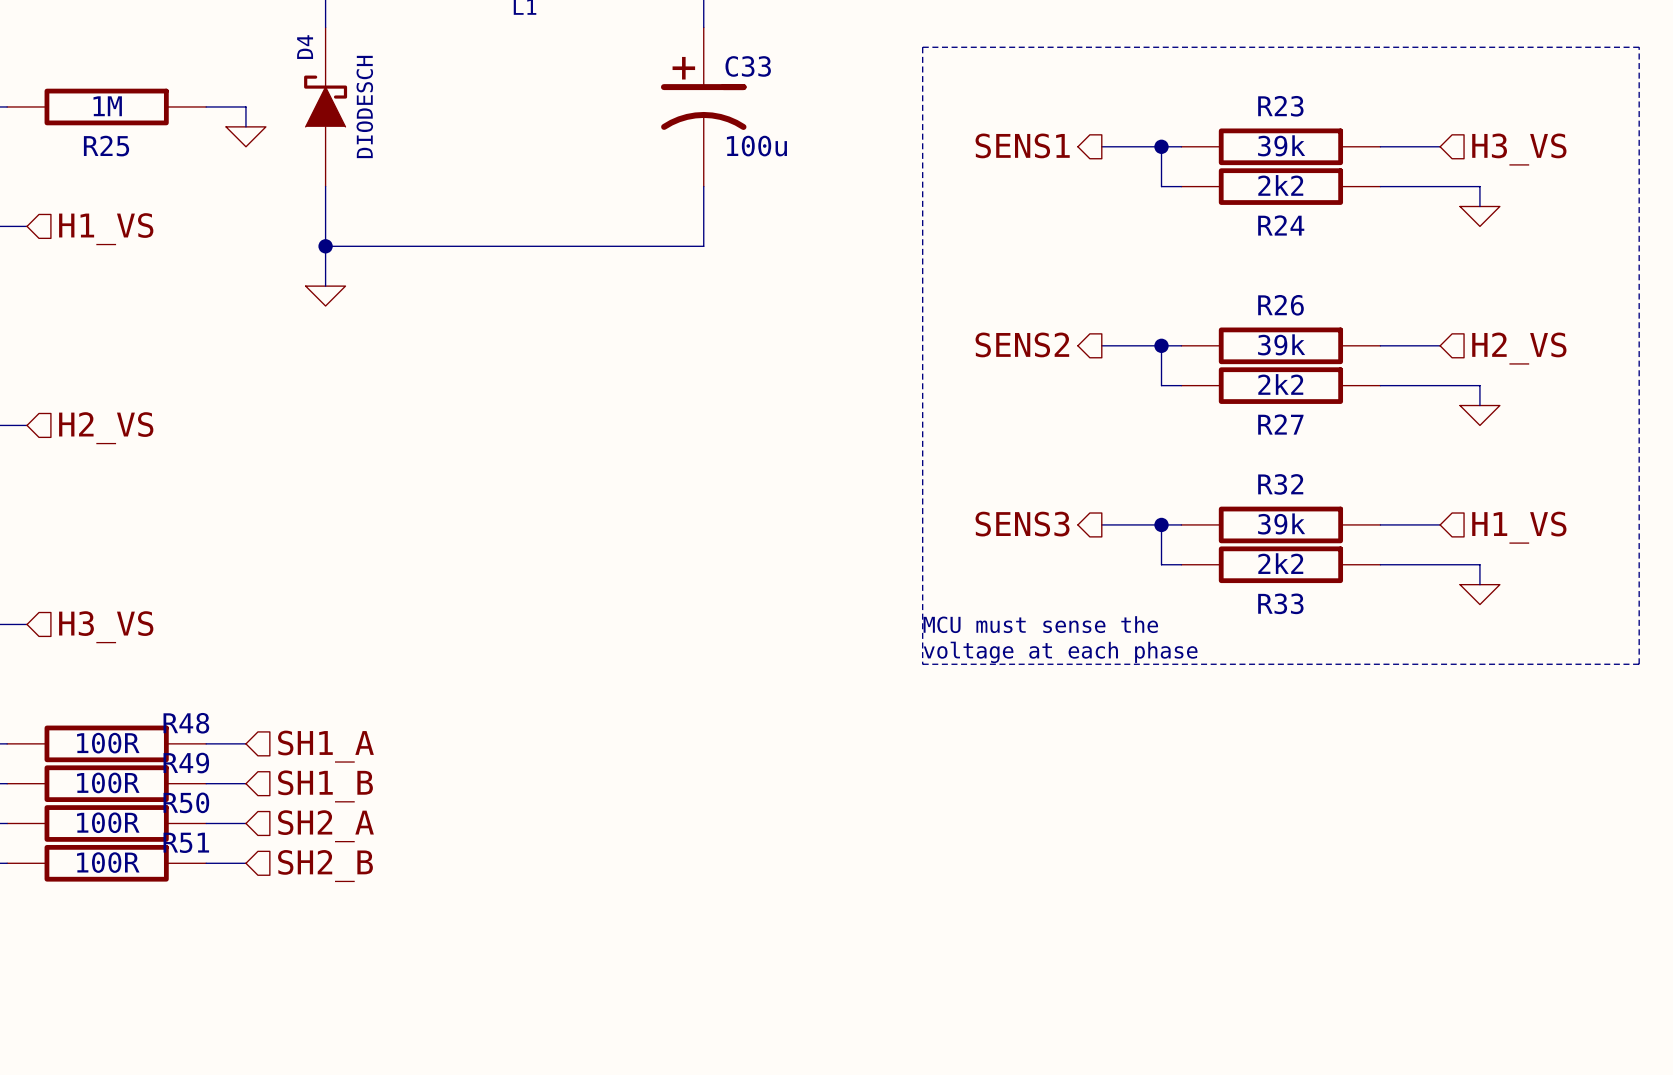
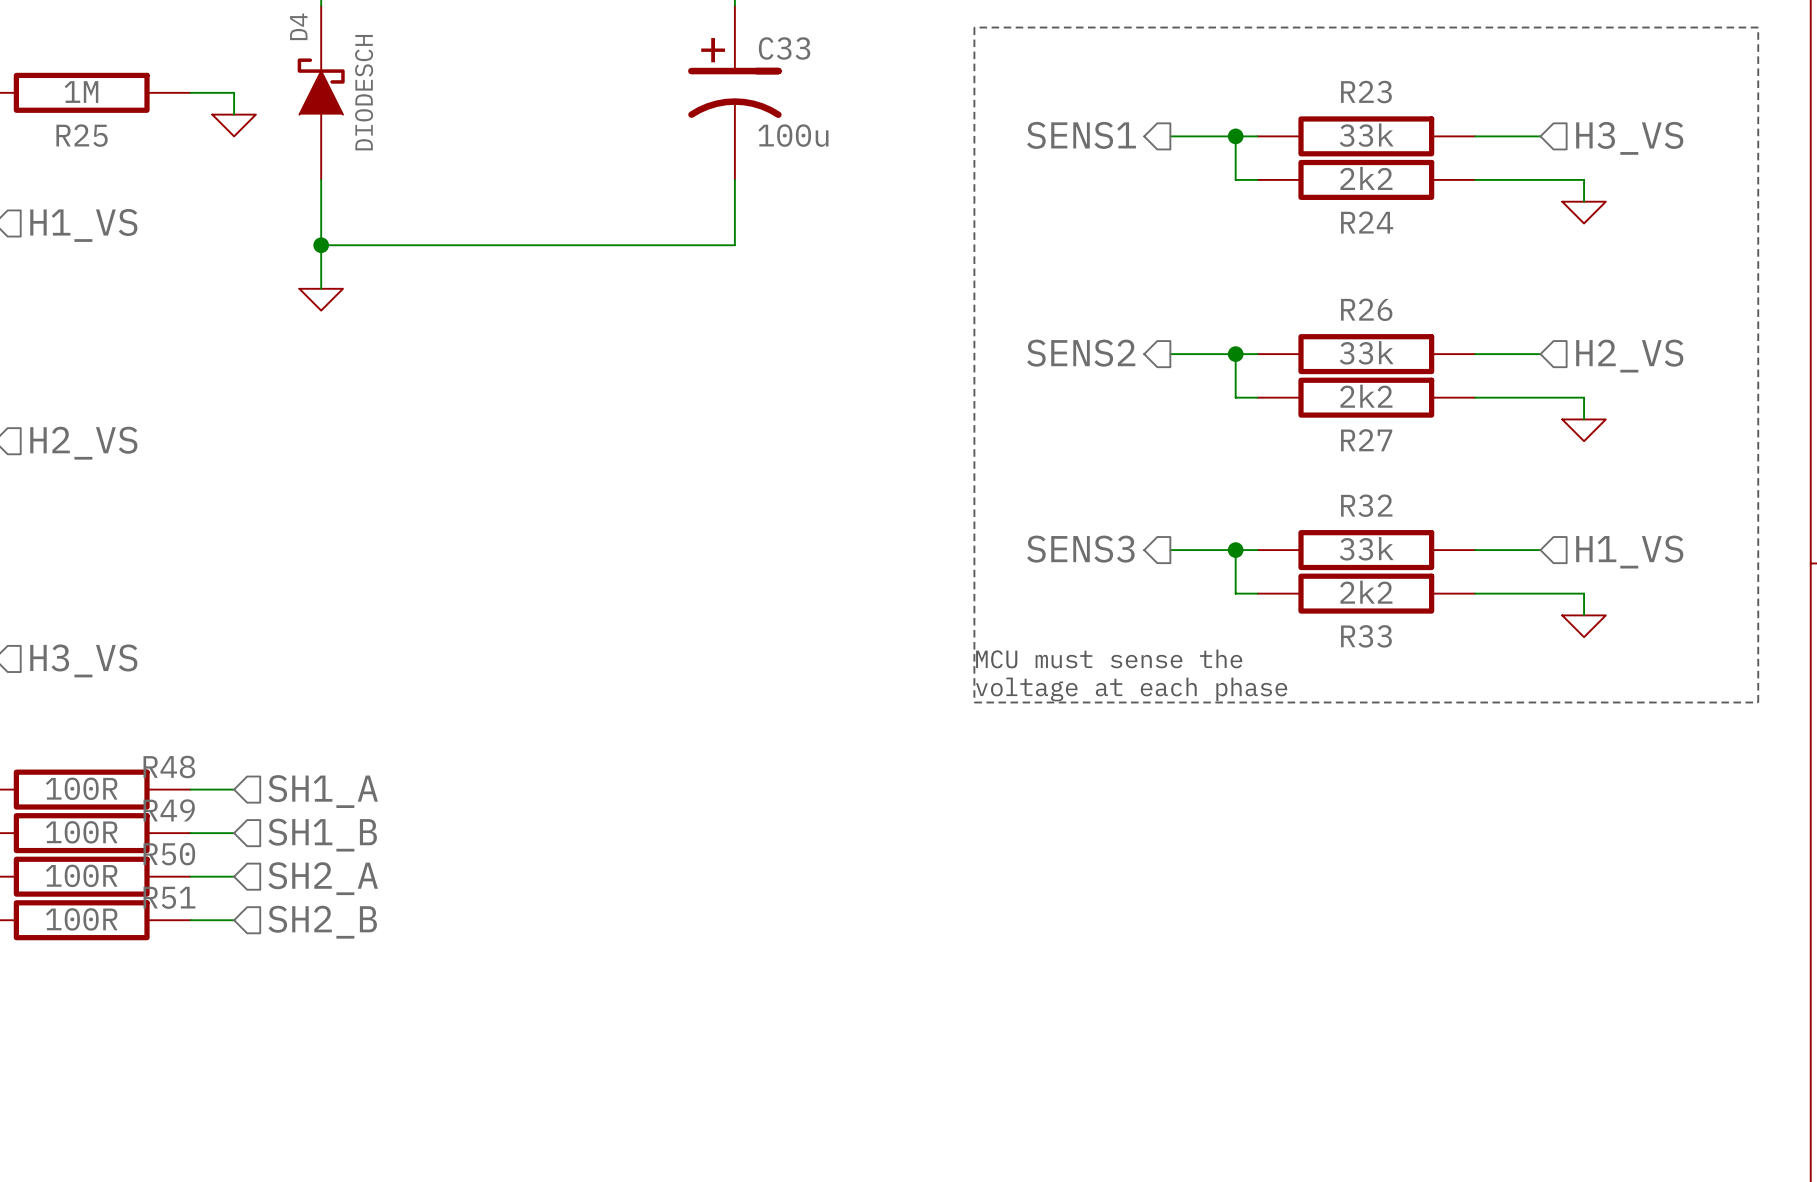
R23 value: 39k (1281, 145) -> 33k (1366, 135)
R26 value: 39k (1281, 344) -> 33k (1366, 352)
R32 value: 39k (1281, 523) -> 33k (1366, 548)

